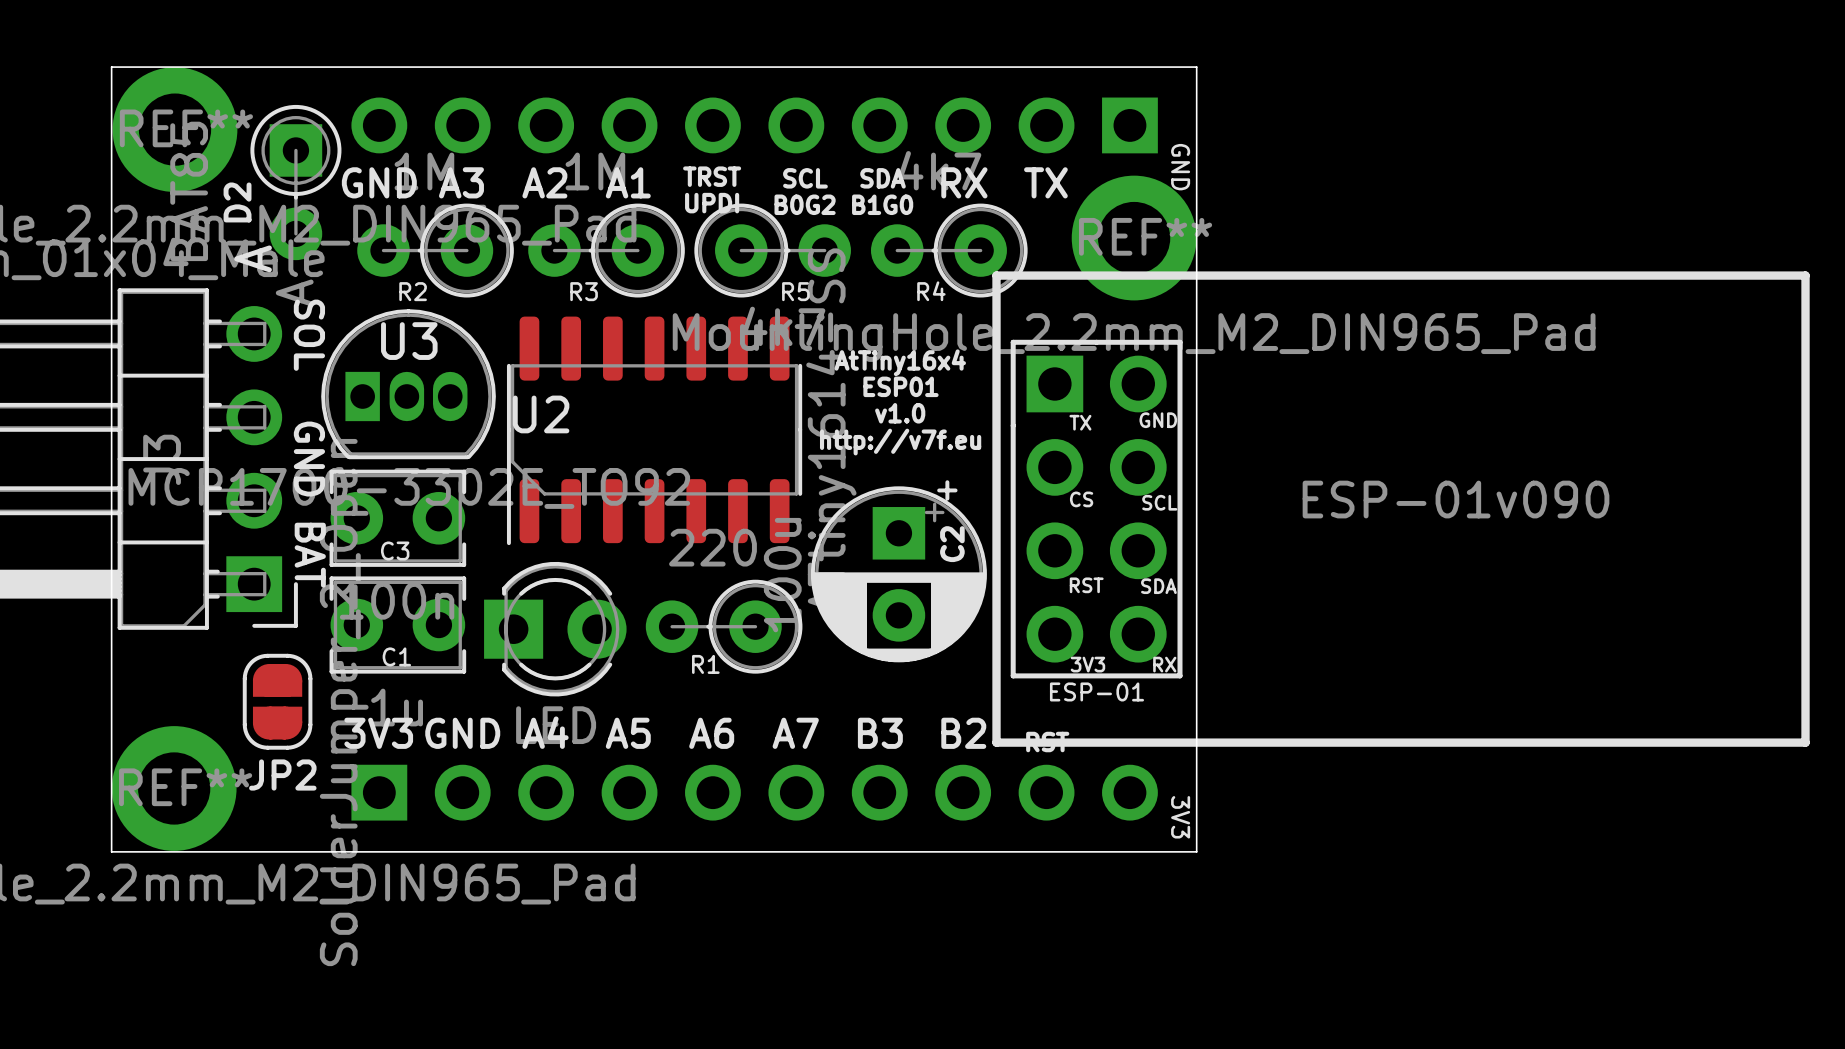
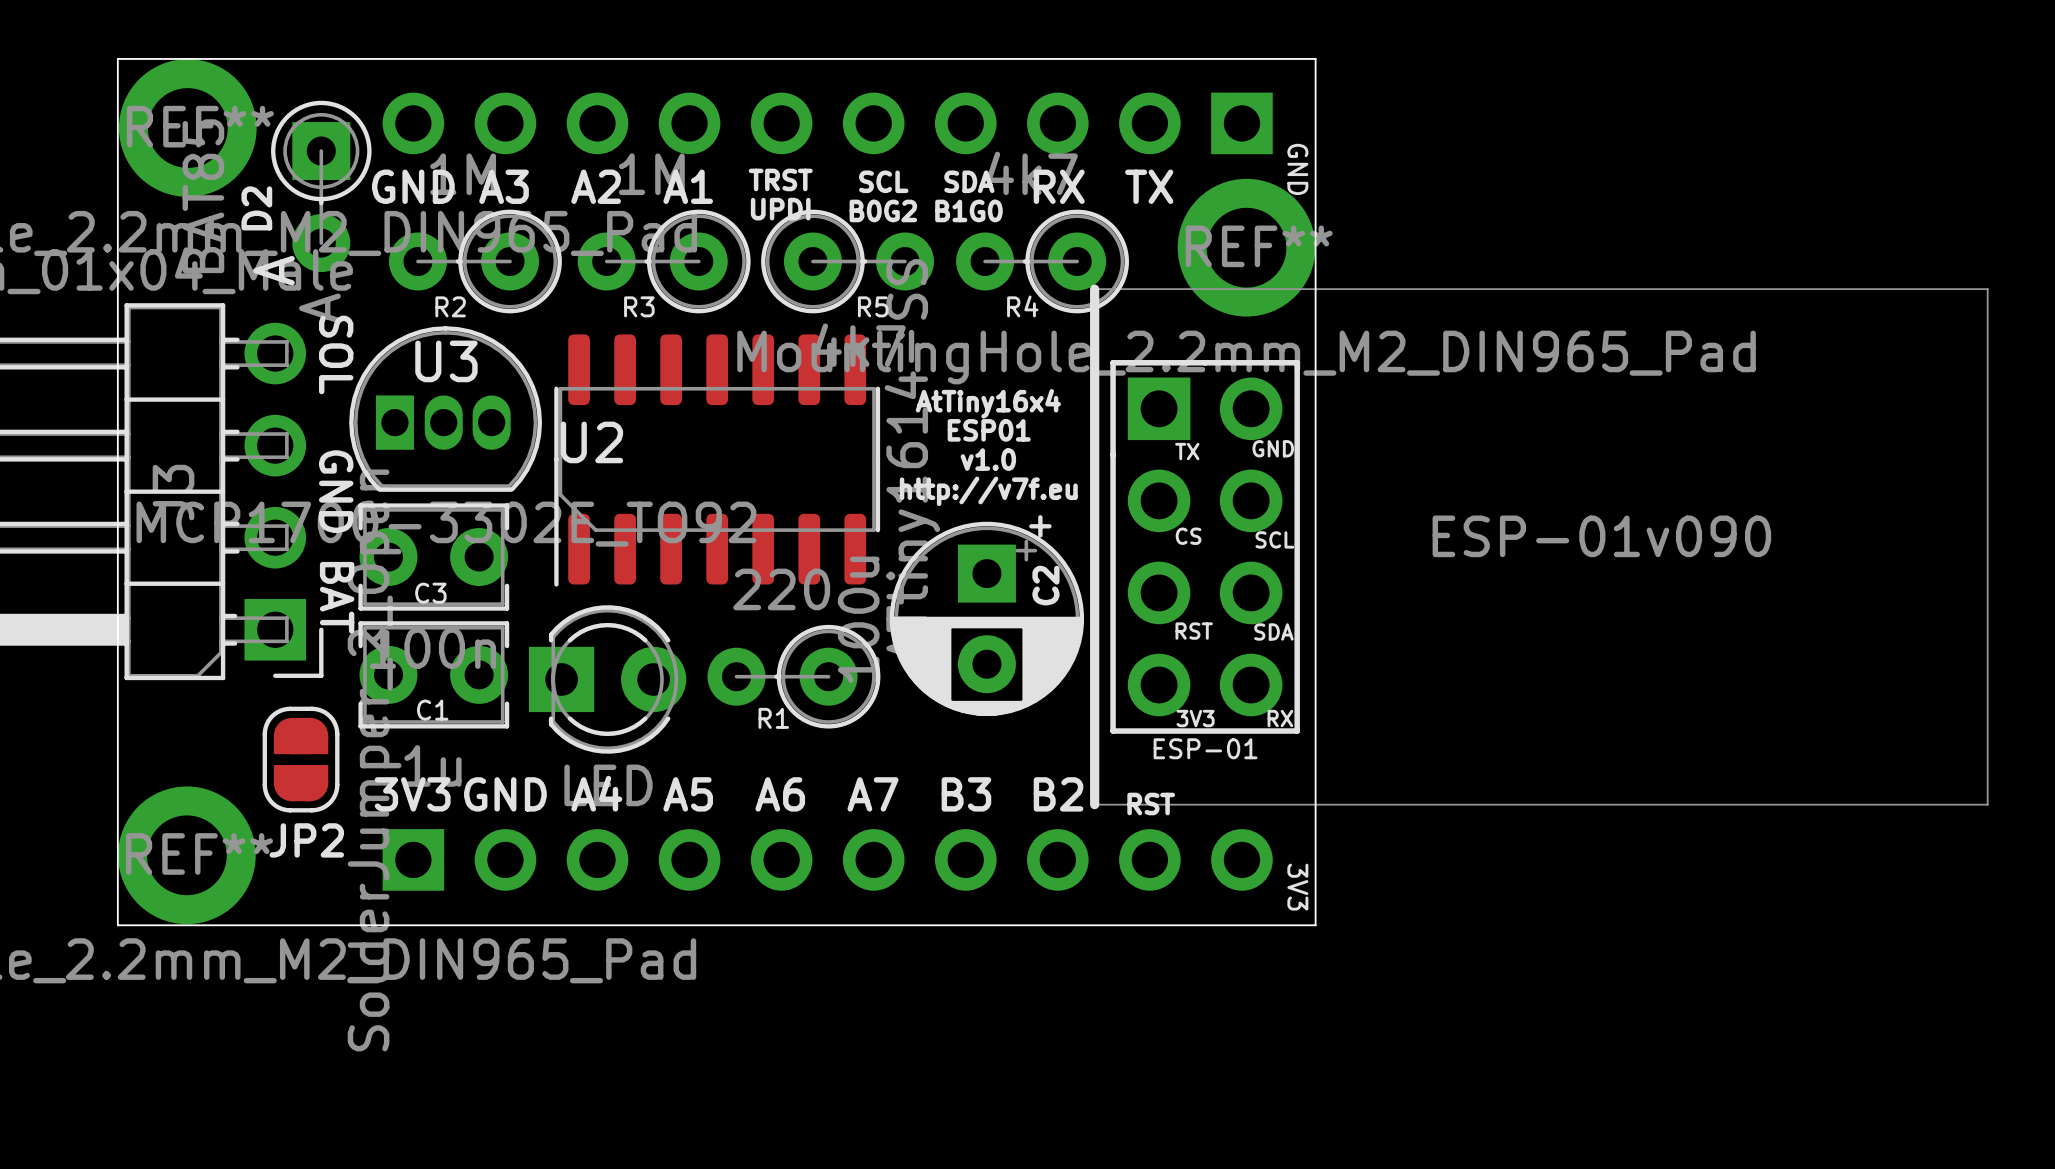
part footprint: [992, 271, 1810, 747] -> [1090, 284, 1989, 810]
text position: AtTiny16x4 (900, 362) -> AtTiny16x4 (988, 403)
text position: ESP01 (900, 386) -> ESP01 (989, 430)
text position: v1.0 (900, 413) -> v1.0 (988, 459)
text position: http://v7f.eu (900, 442) -> http://v7f.eu (988, 491)

